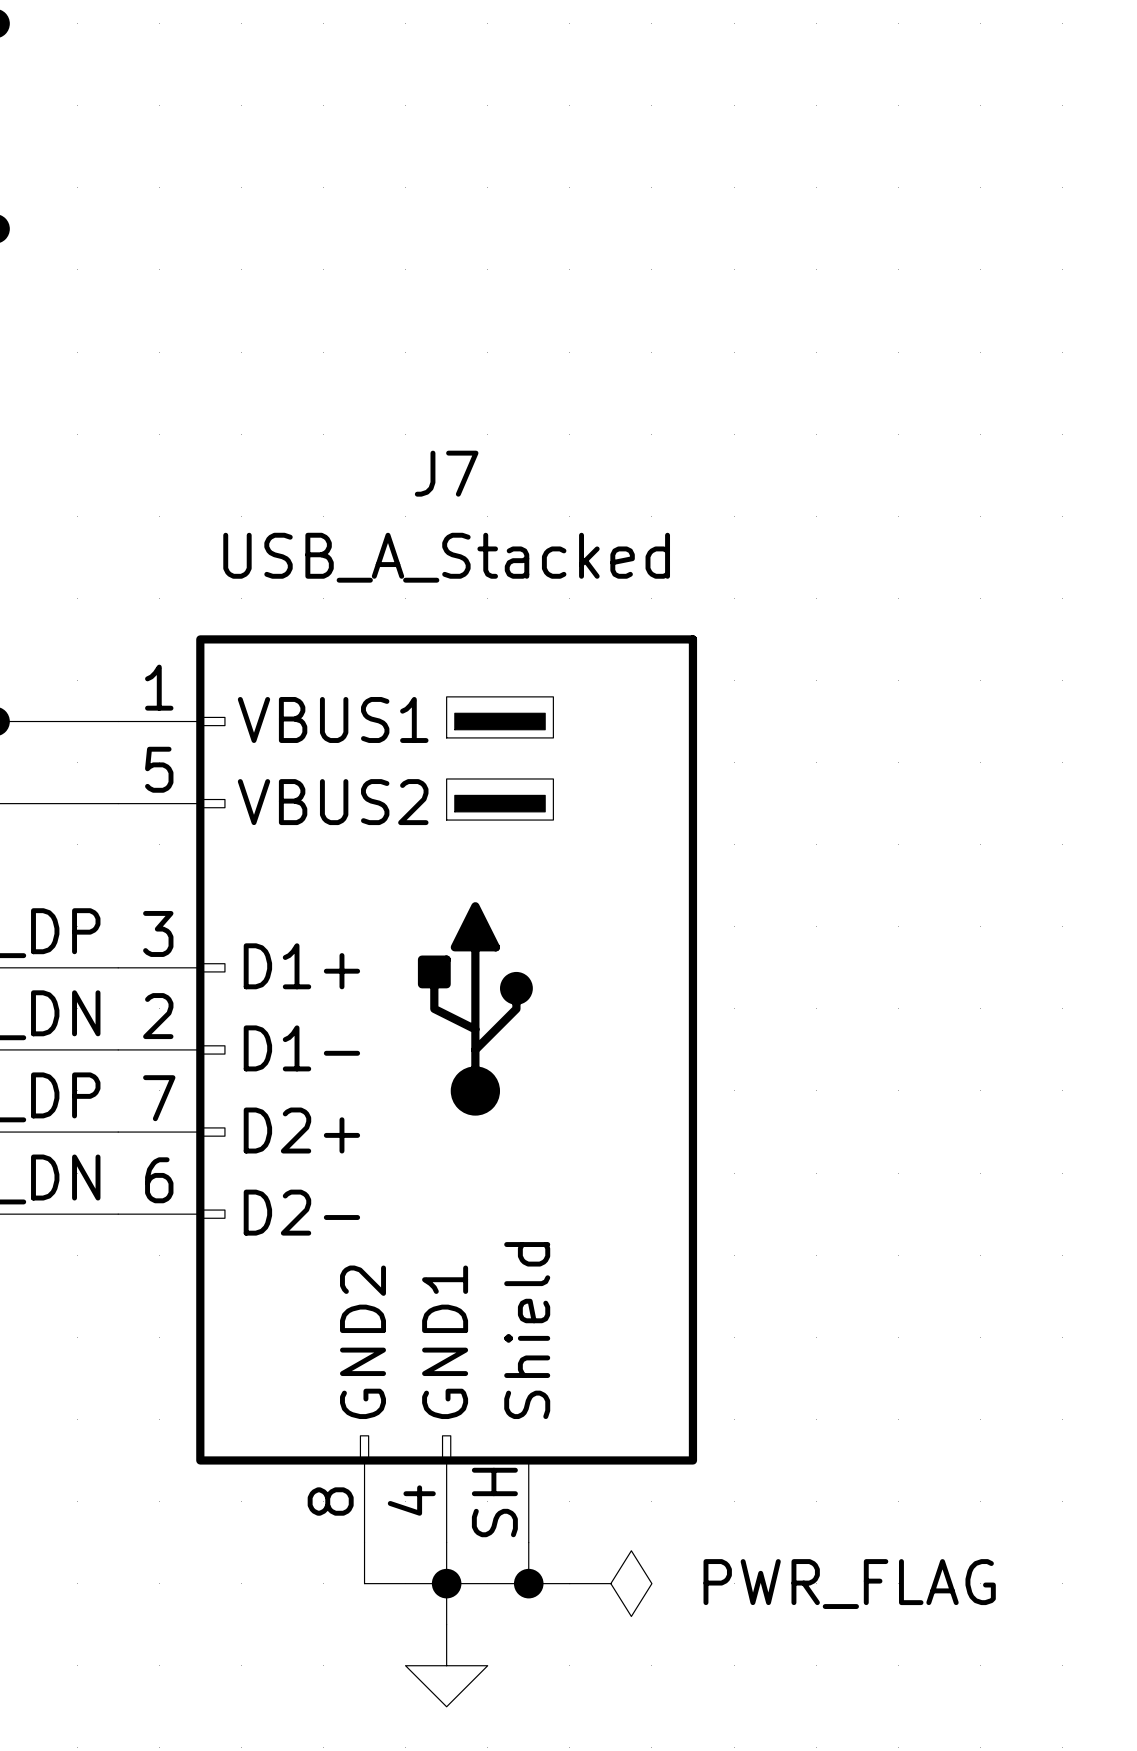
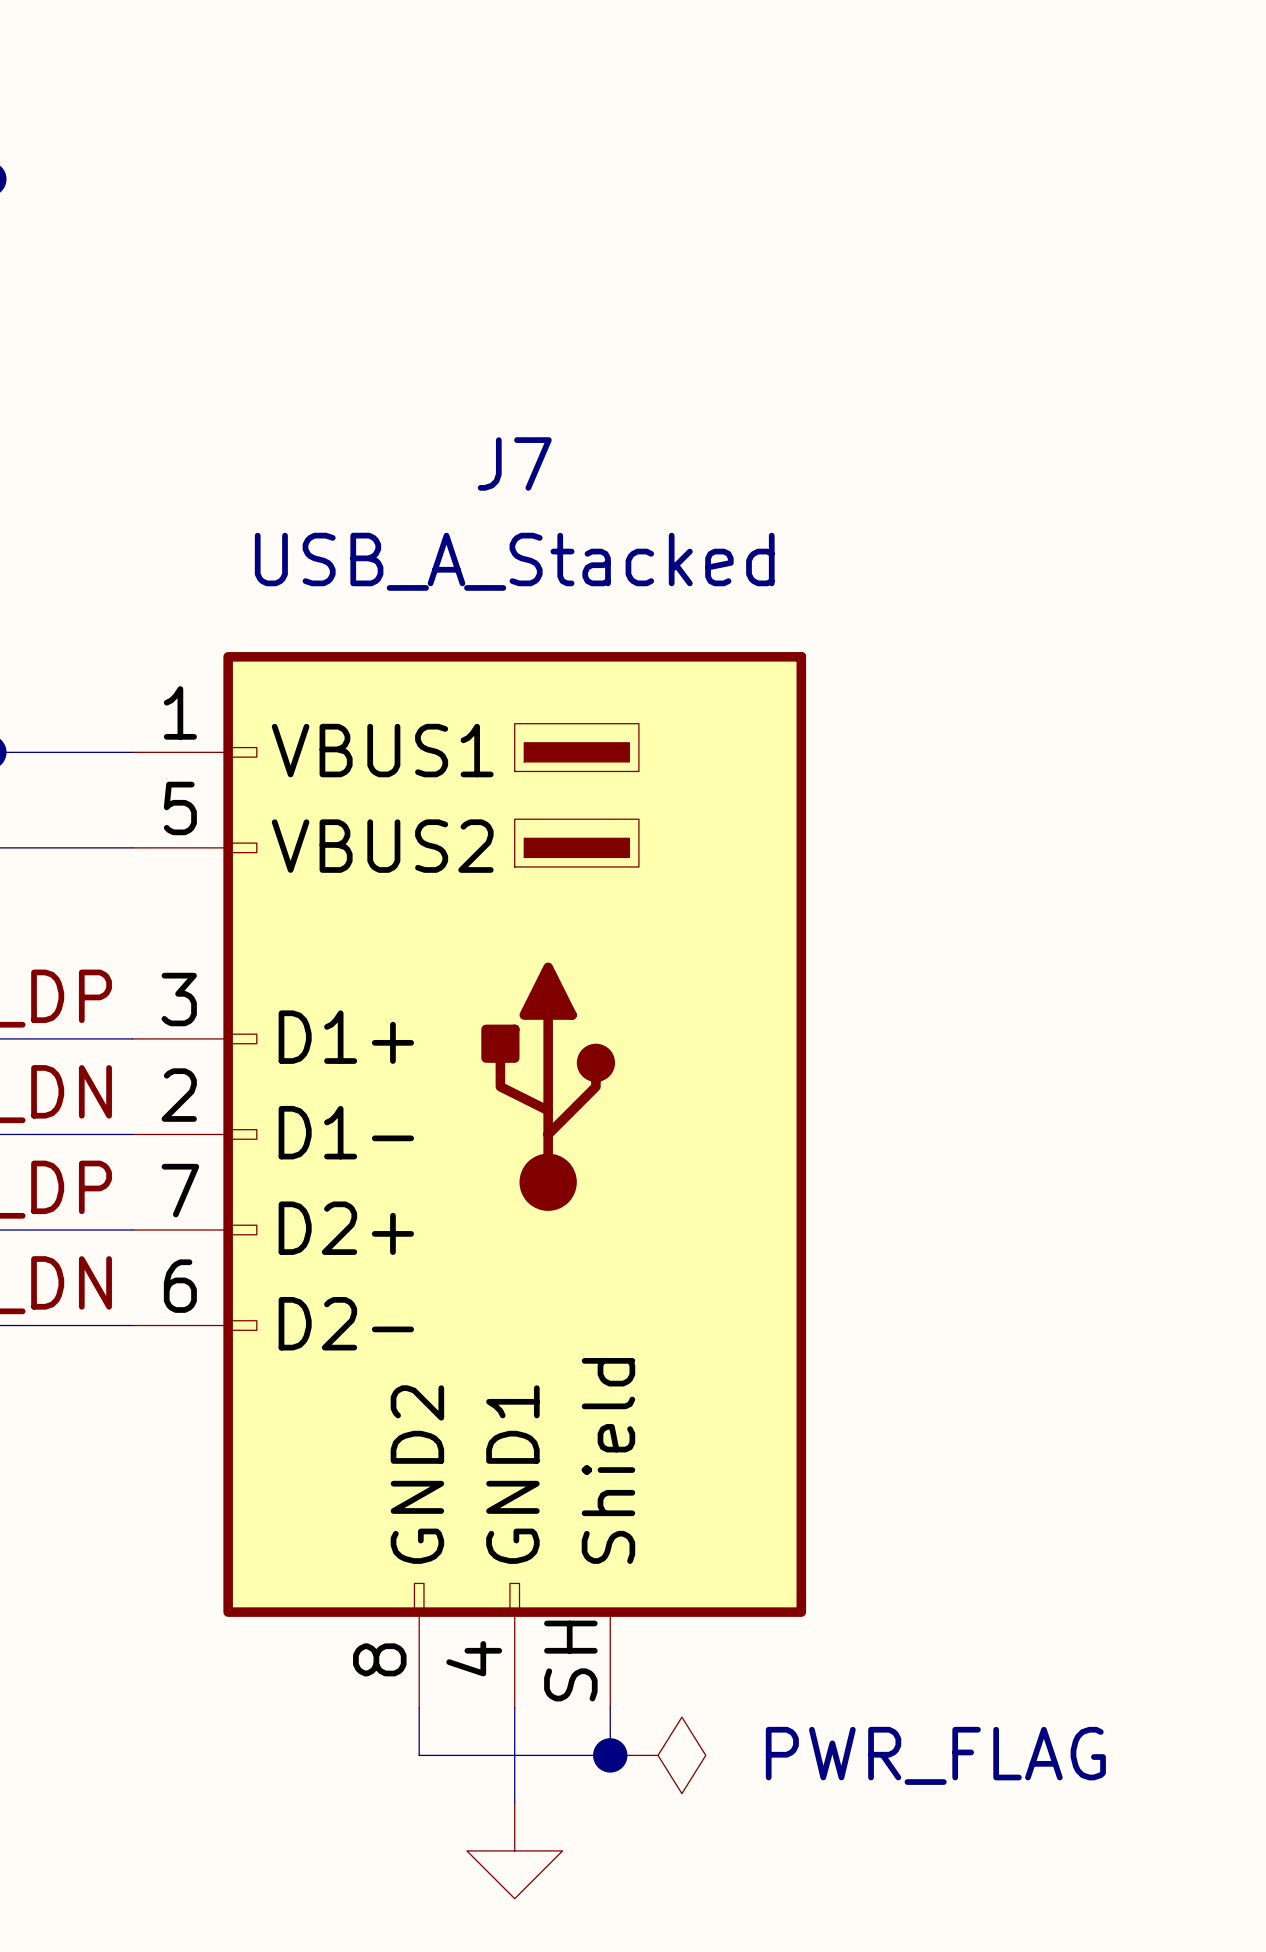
junction: (446, 1583) -> none
power symbol position: PWR_FLAG (610, 1583) -> PWR_FLAG (658, 1755)

